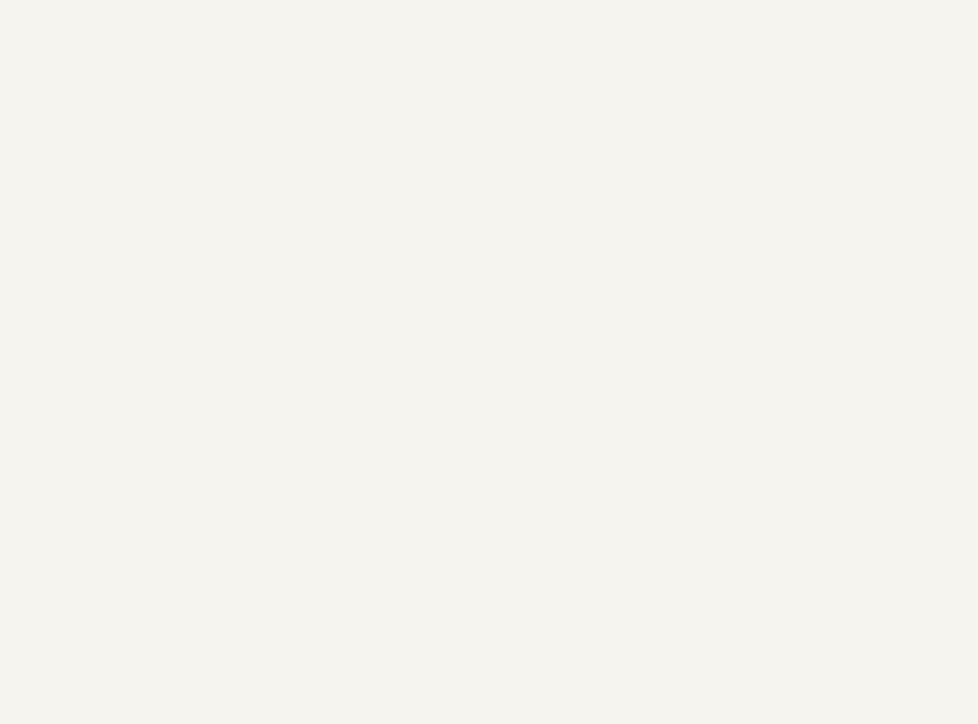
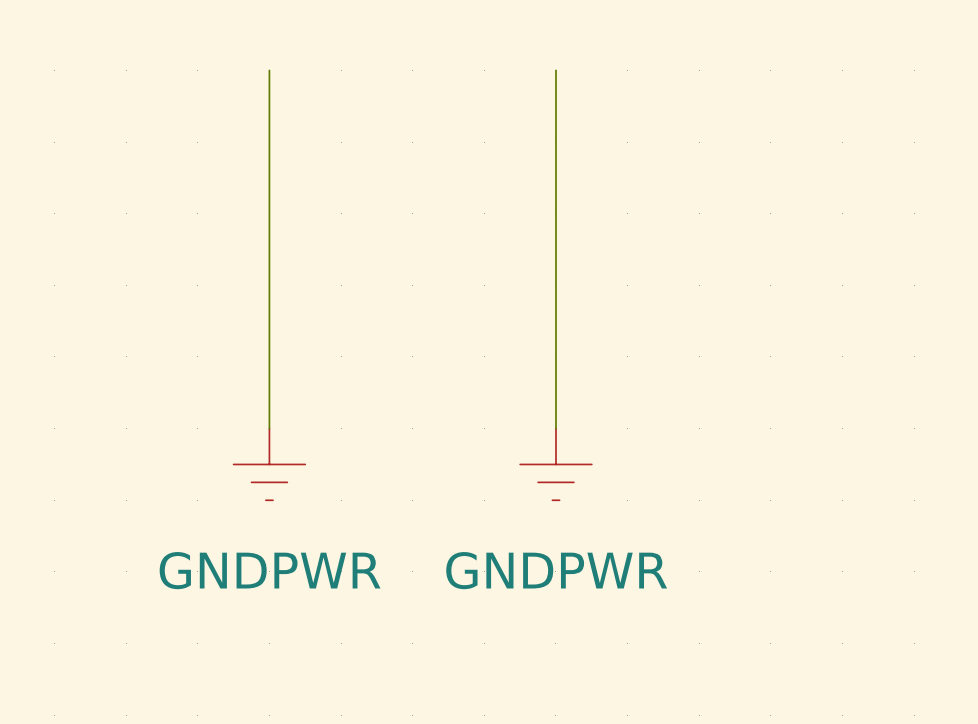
wire: none -> (269, 70) (269, 428)
wire: none -> (555, 70) (555, 428)
power symbol: none -> GNDPWR (269, 464)
power symbol: none -> GNDPWR (555, 464)

